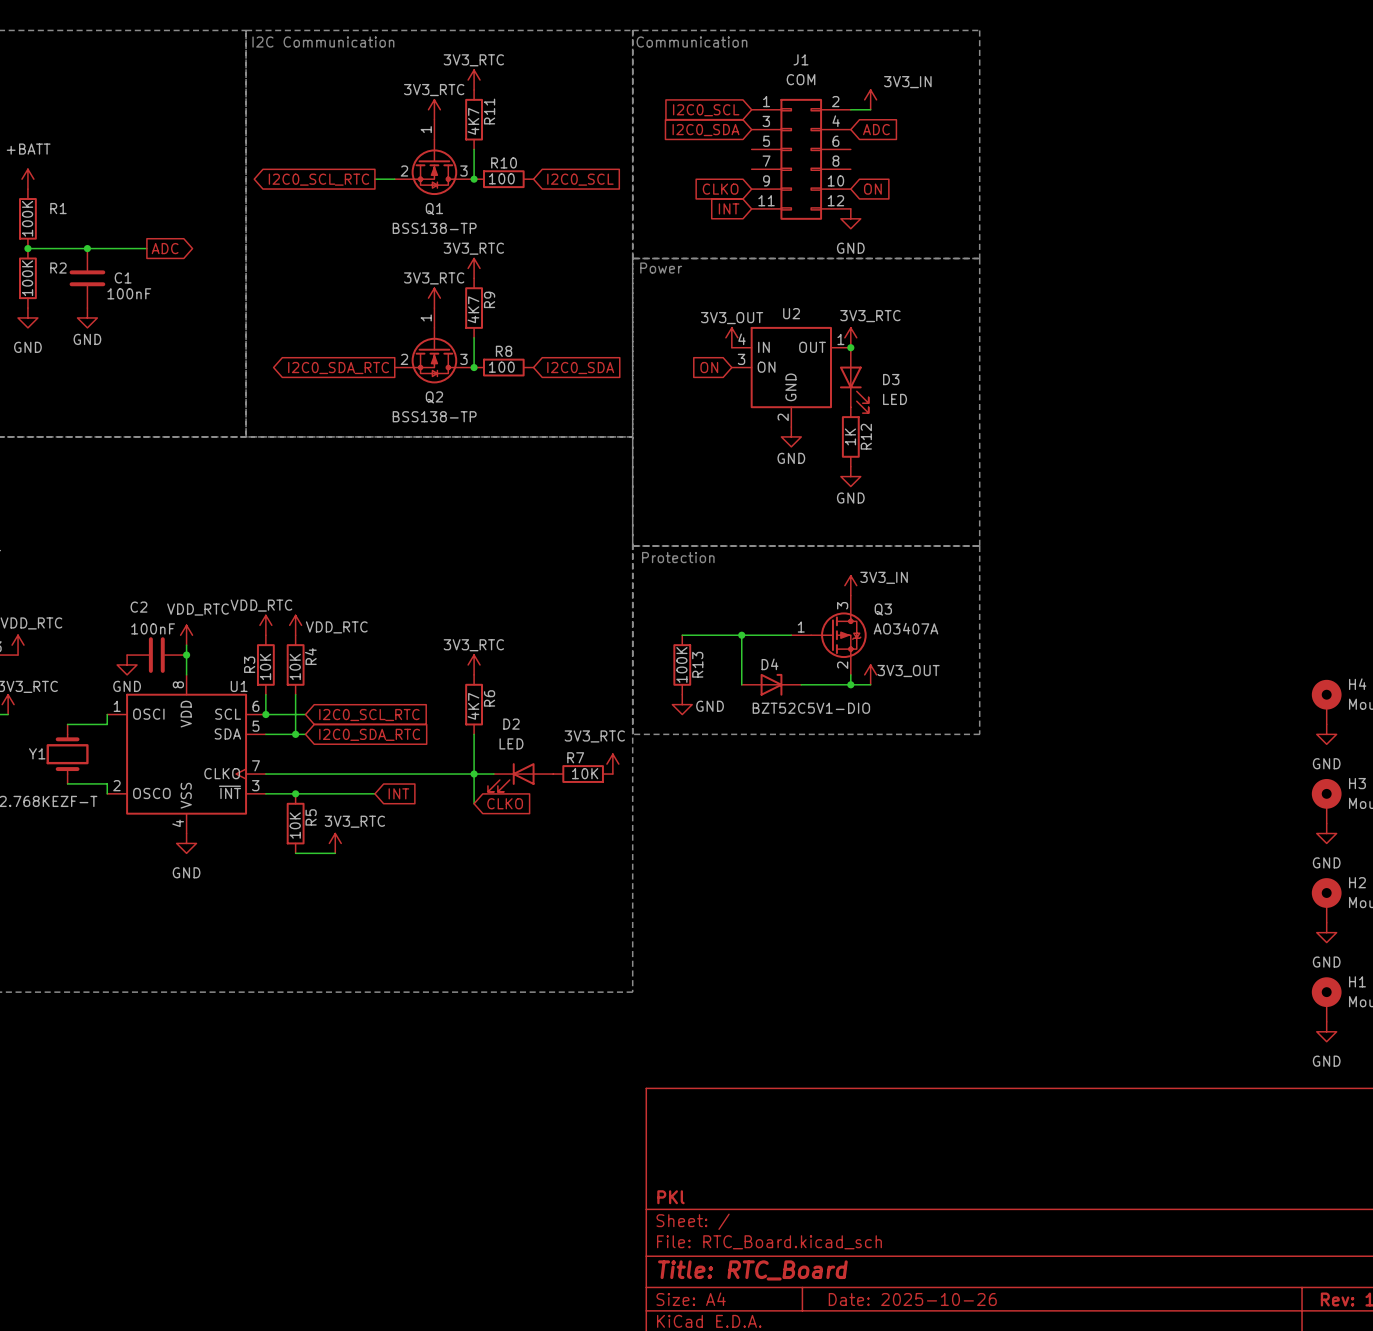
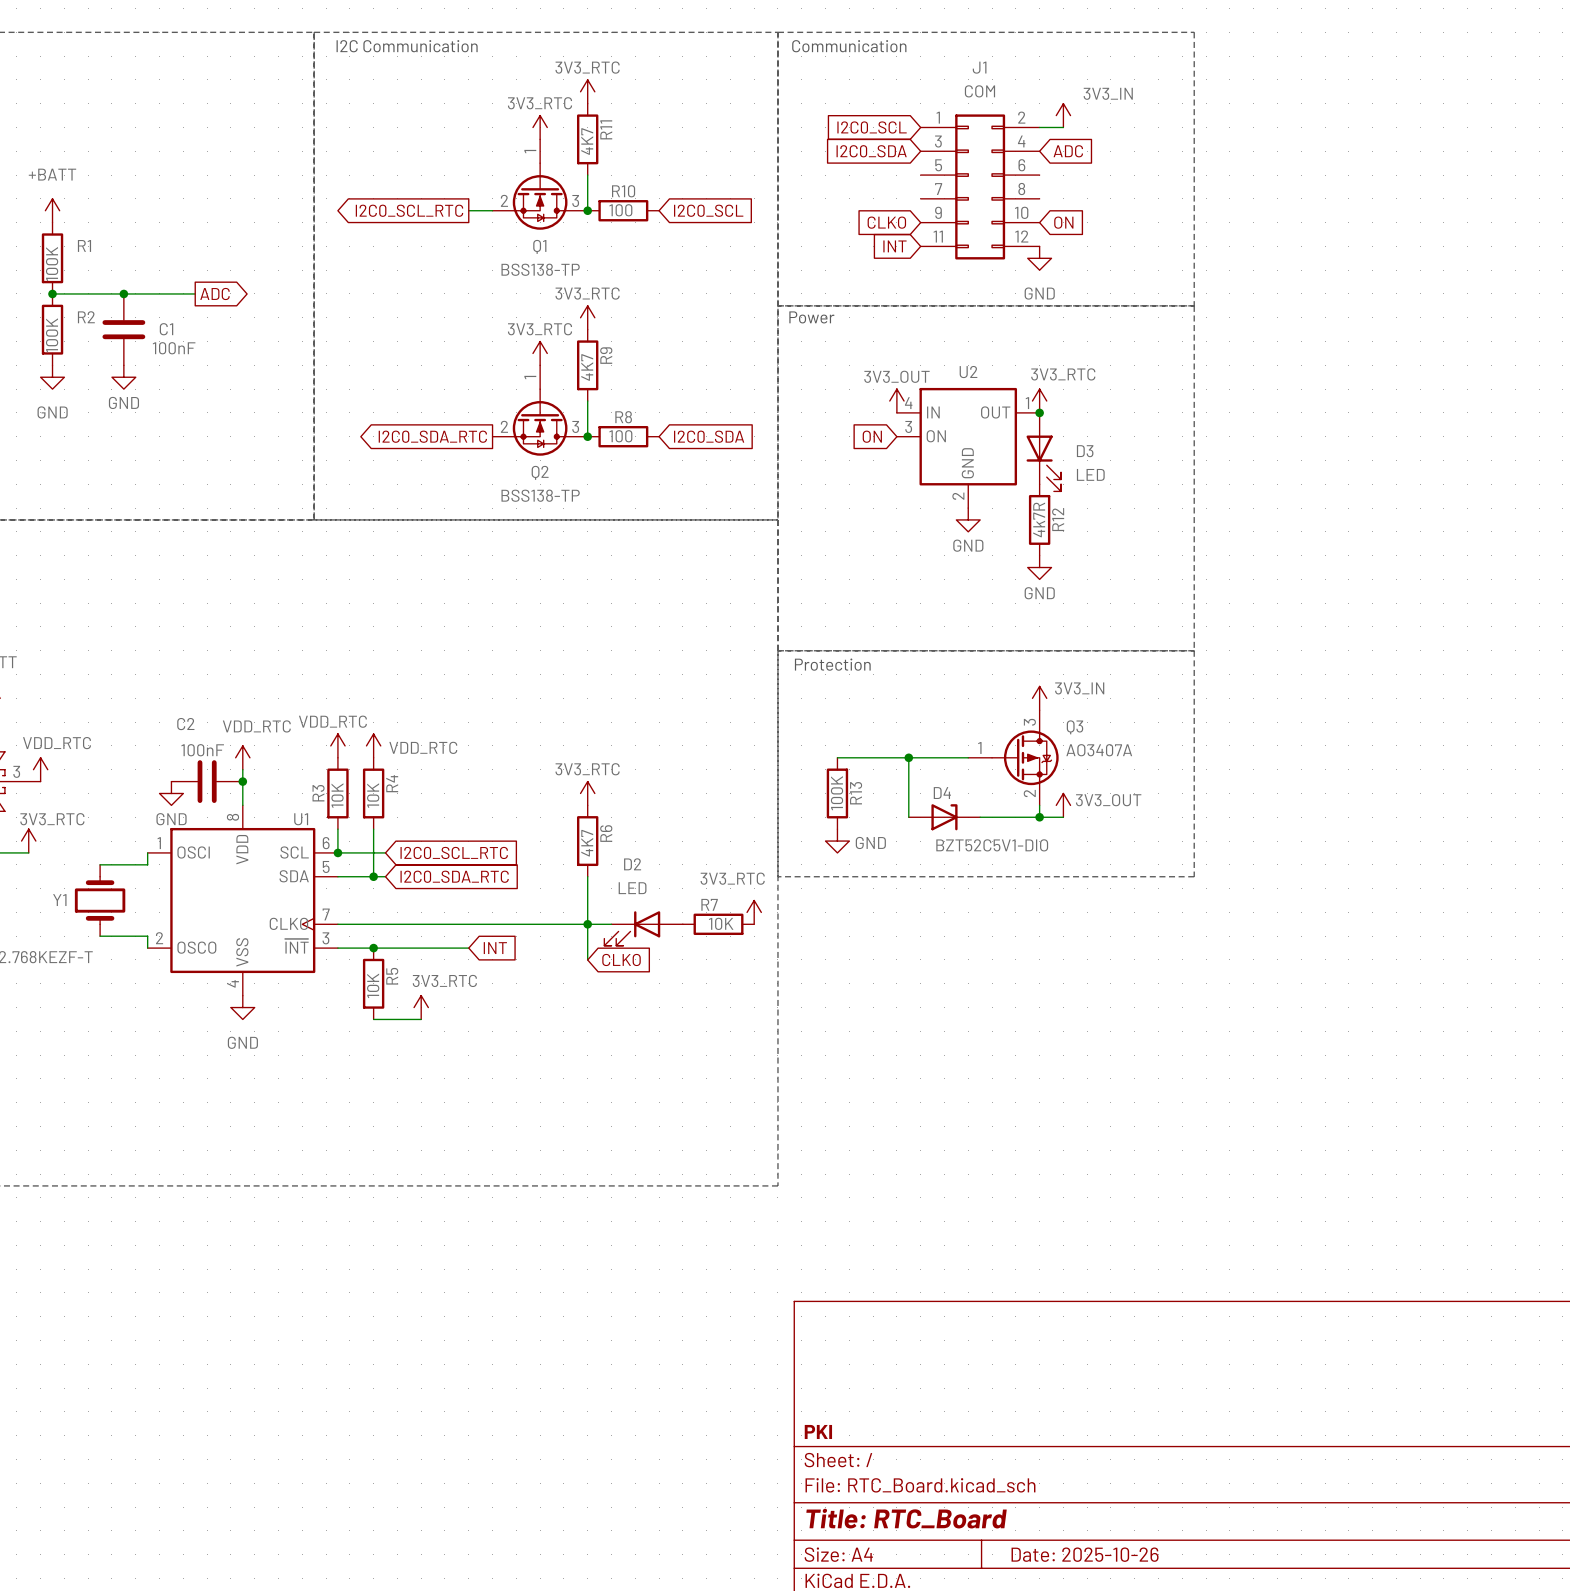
R12 value: 1K (850, 436) -> 4k7R (1039, 519)

